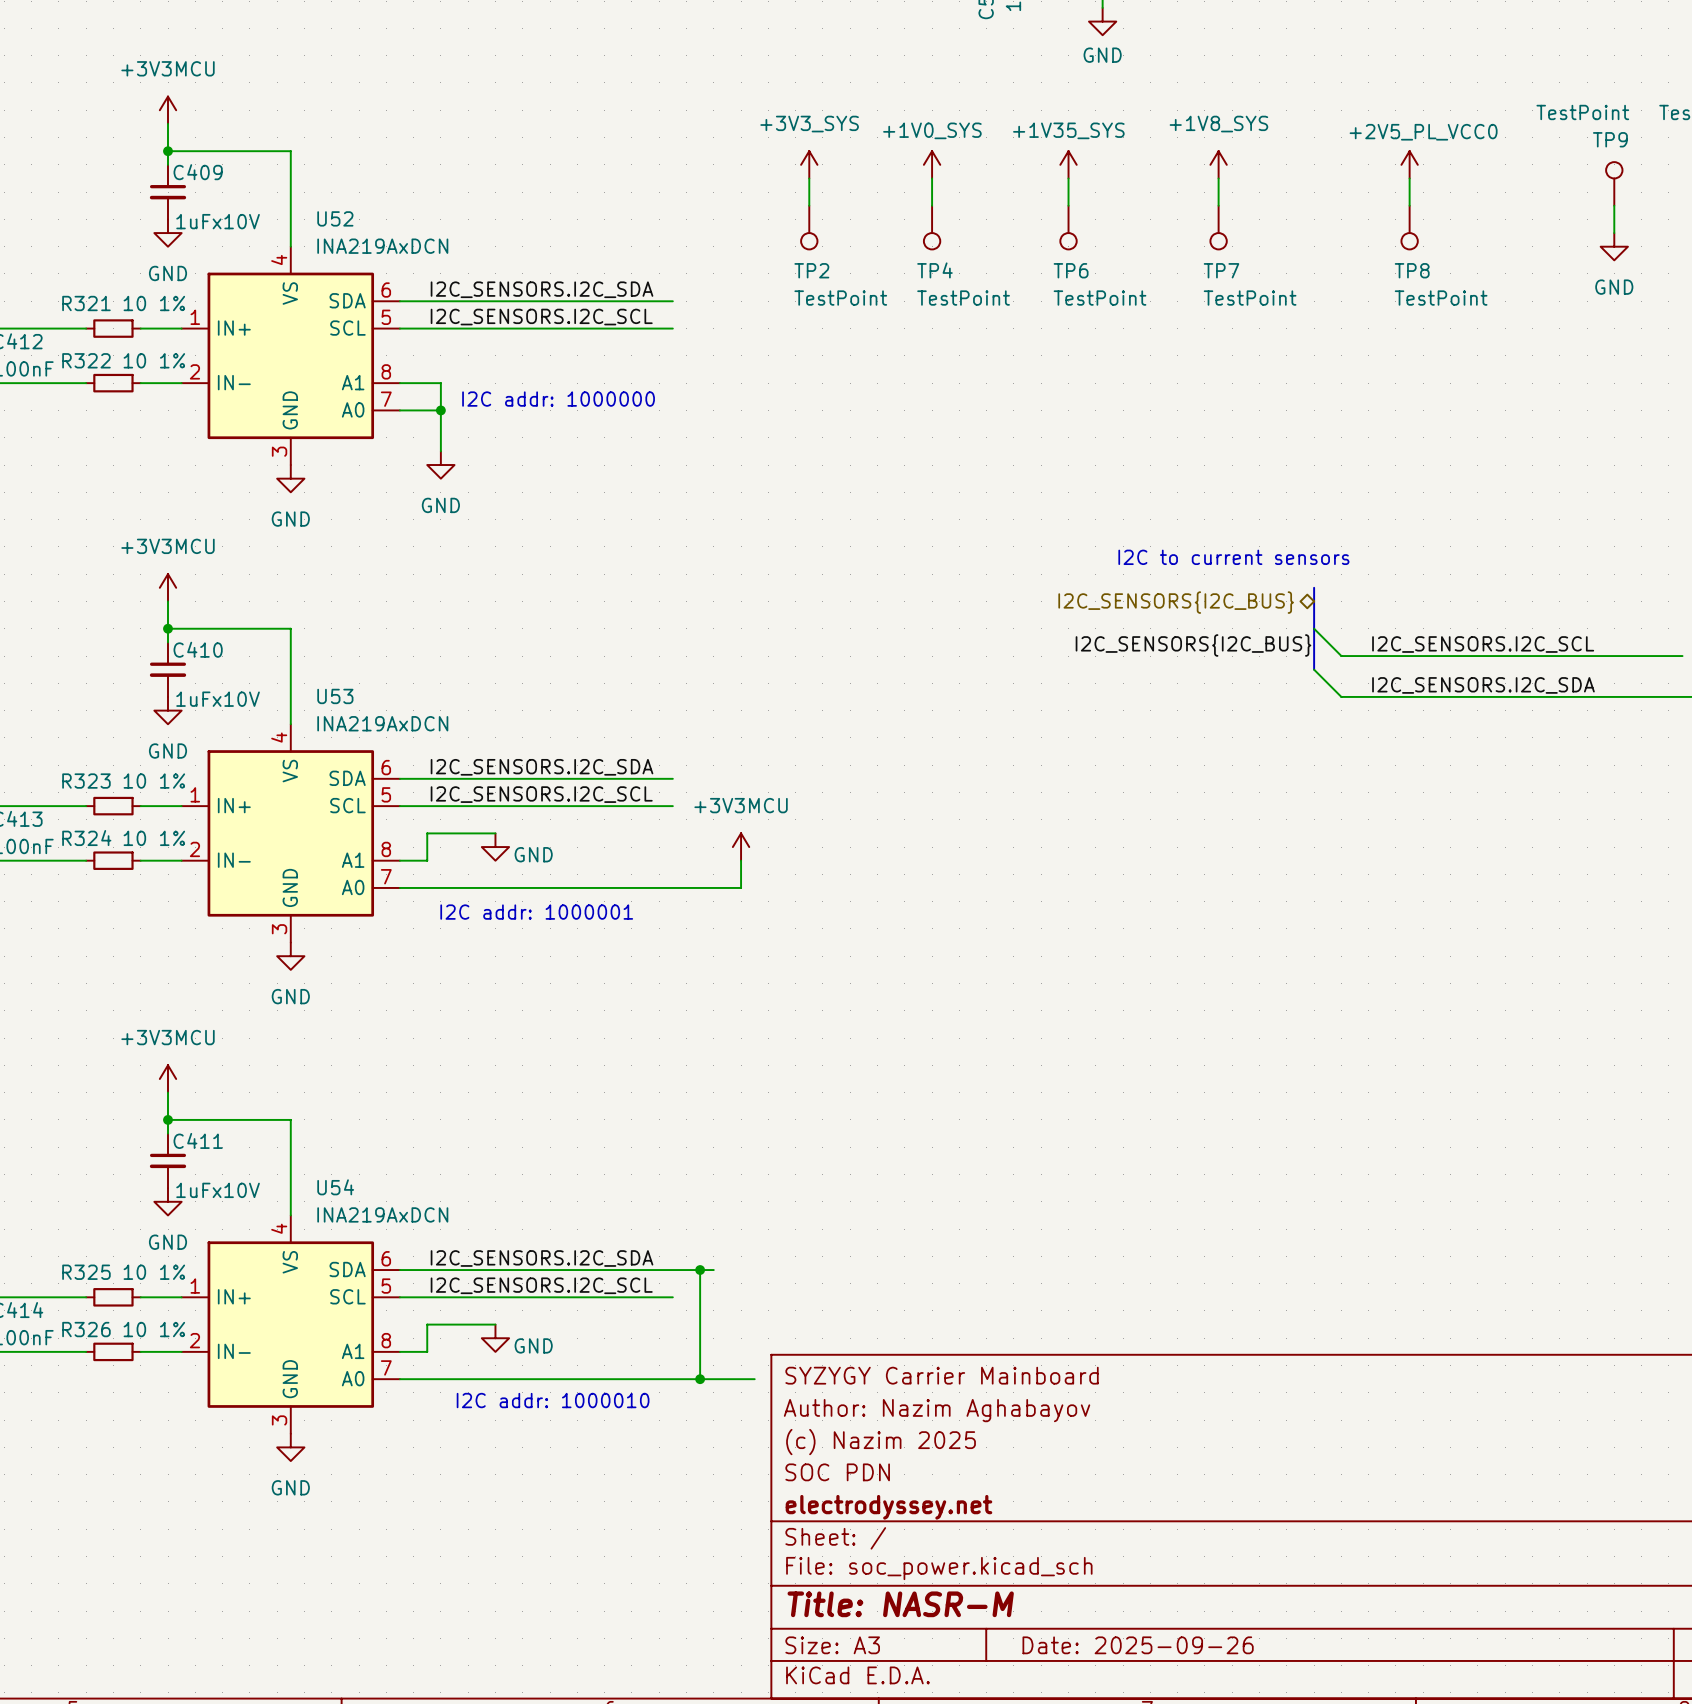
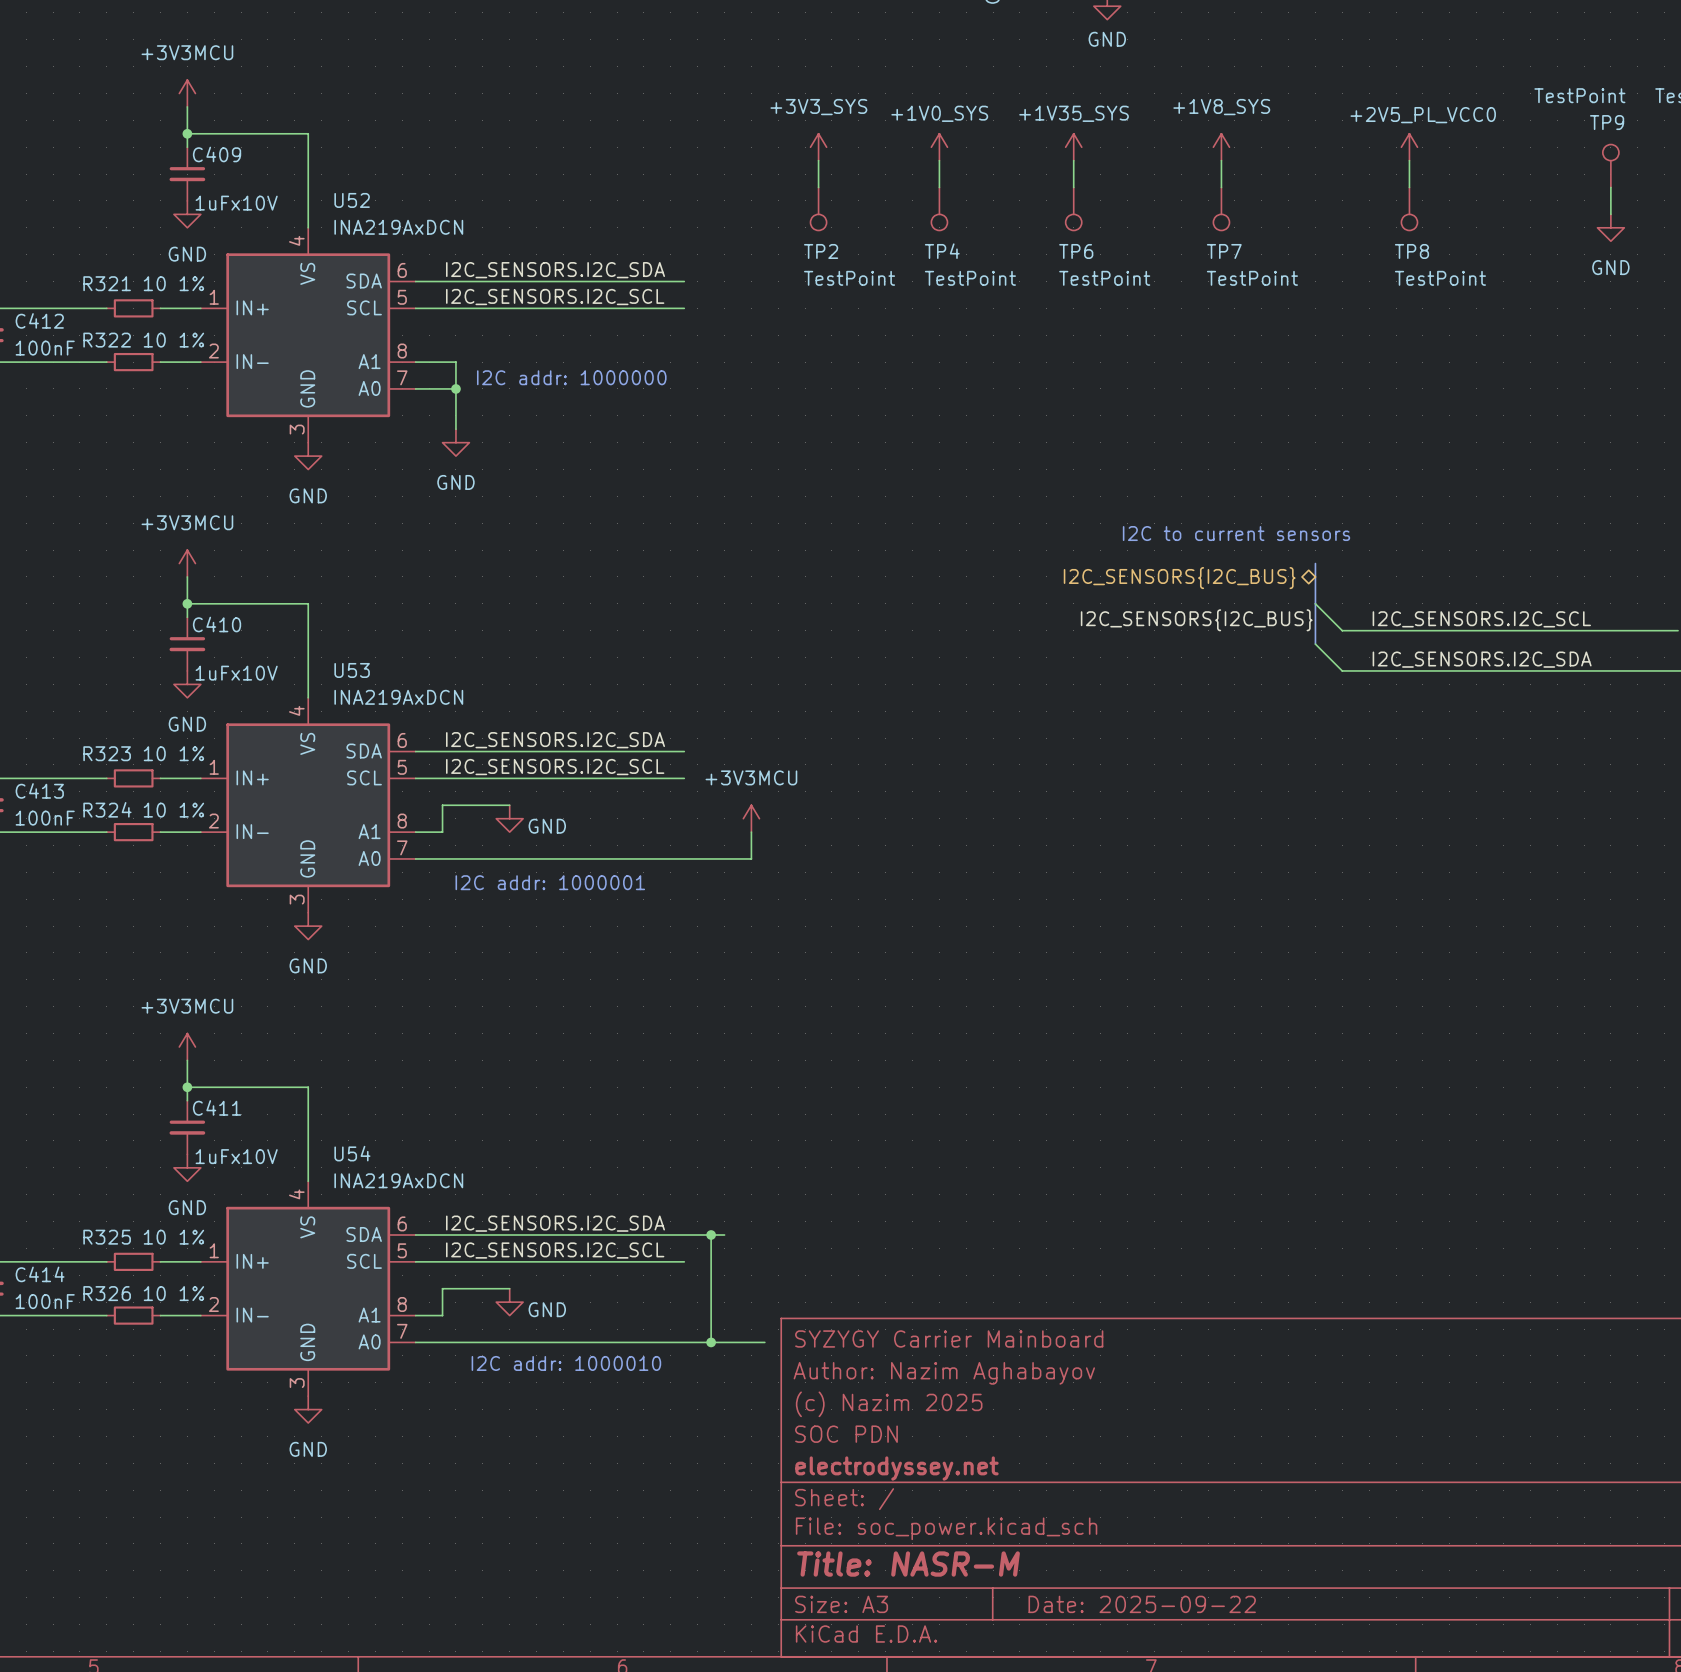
title block: Date: 2025-09-26 (1138, 1645) -> Date: 2025-09-22 (1142, 1604)

